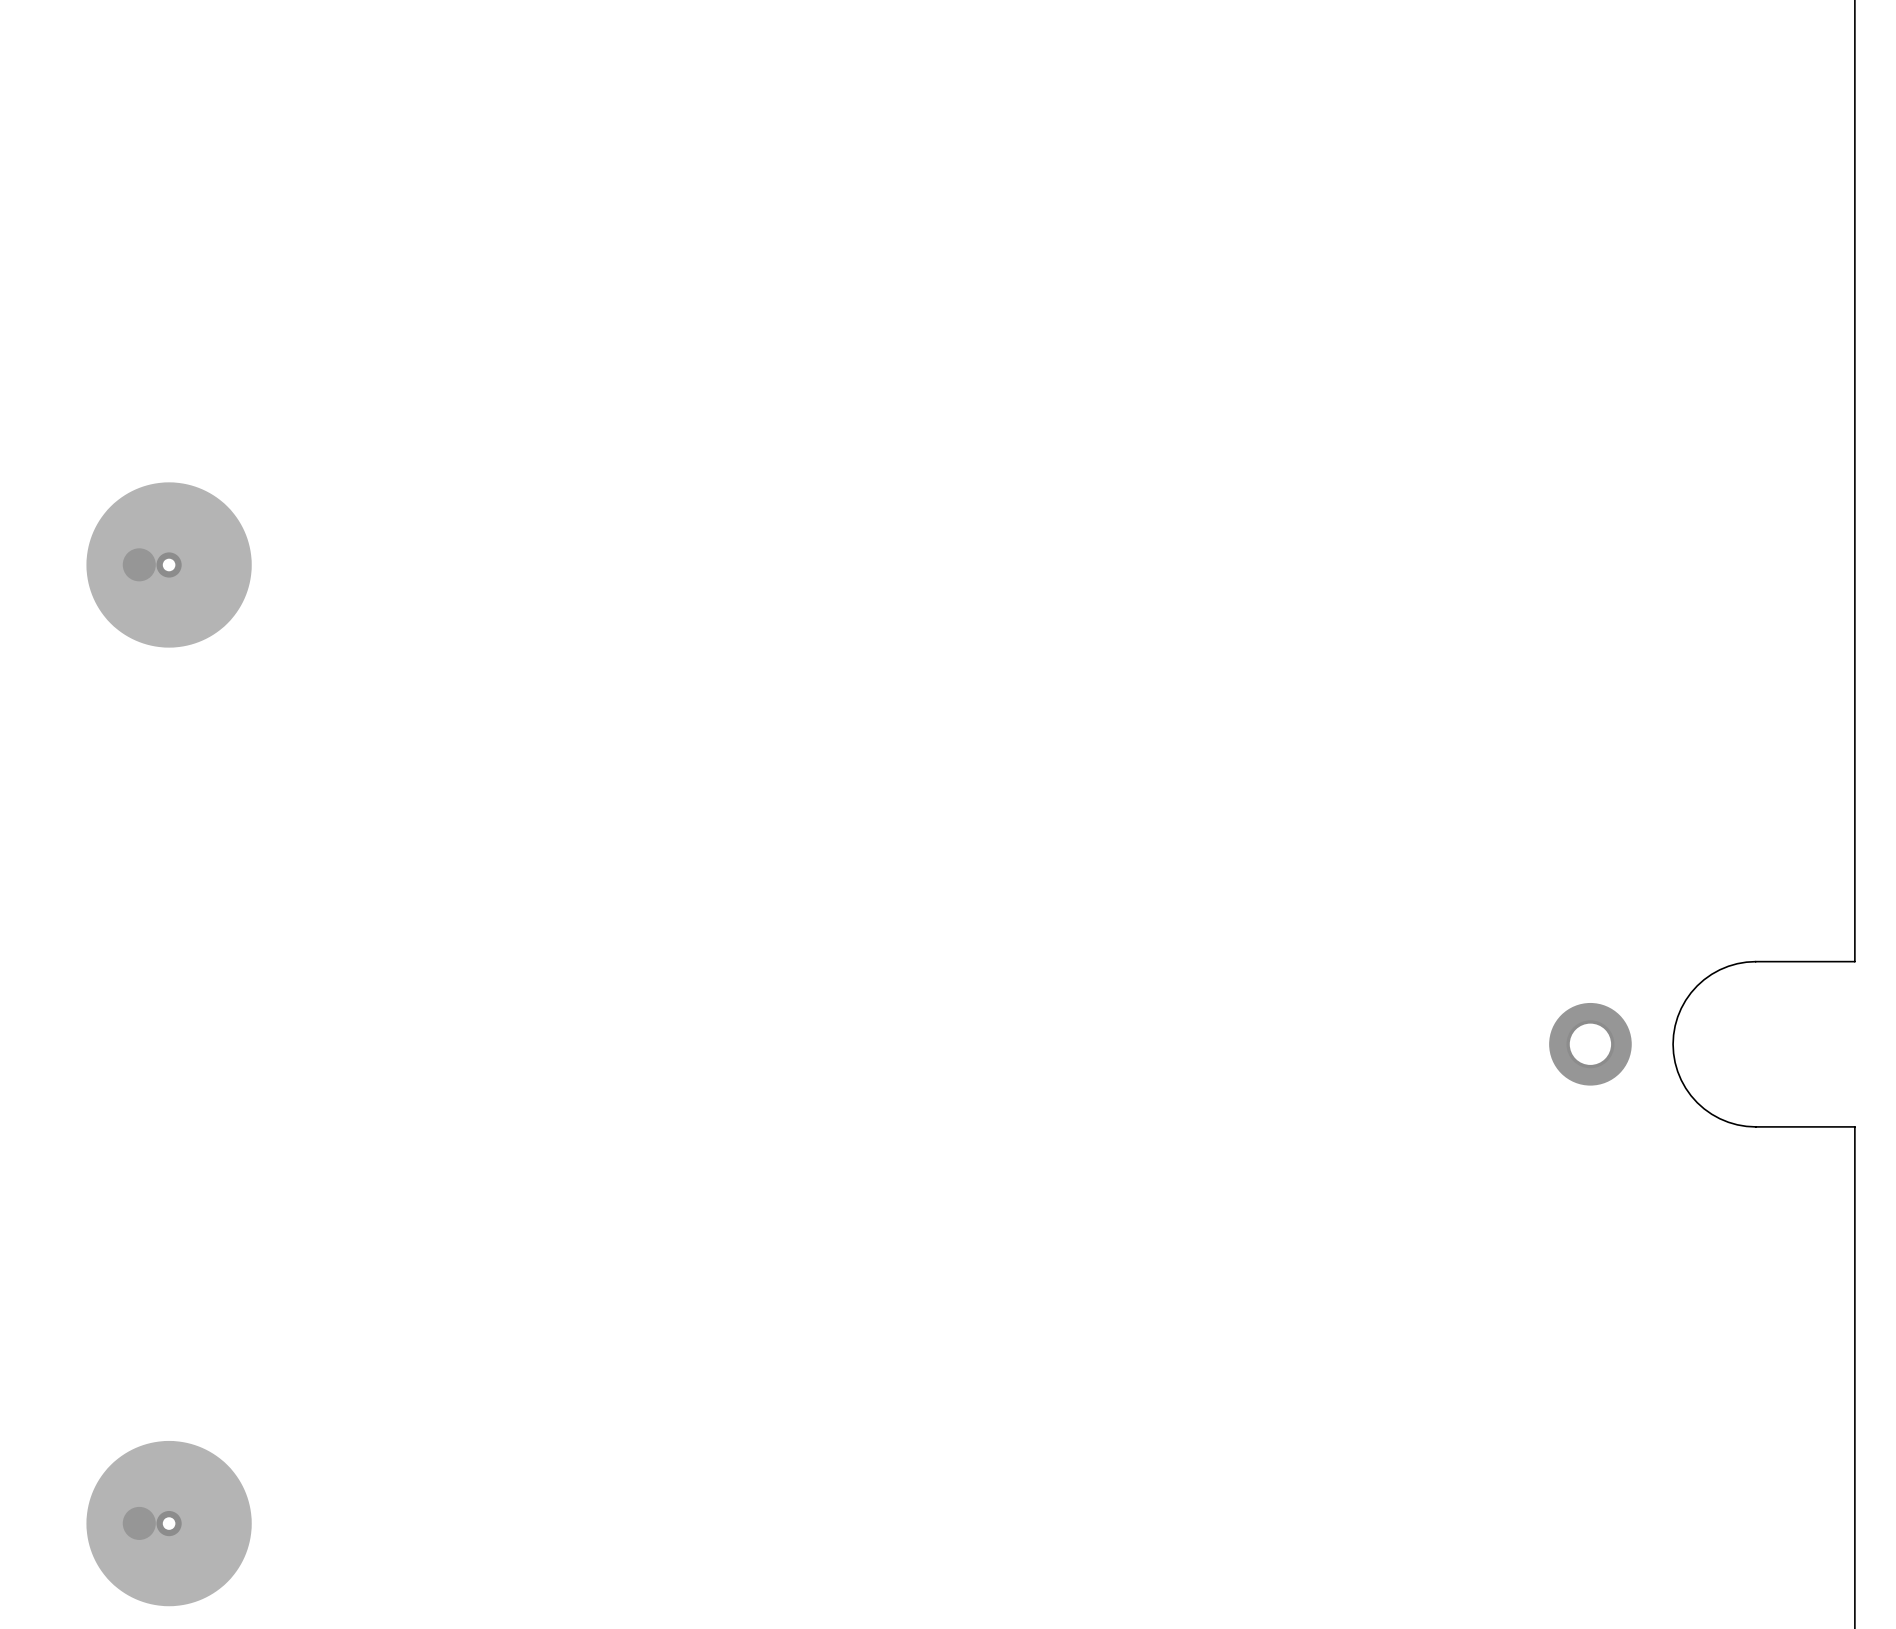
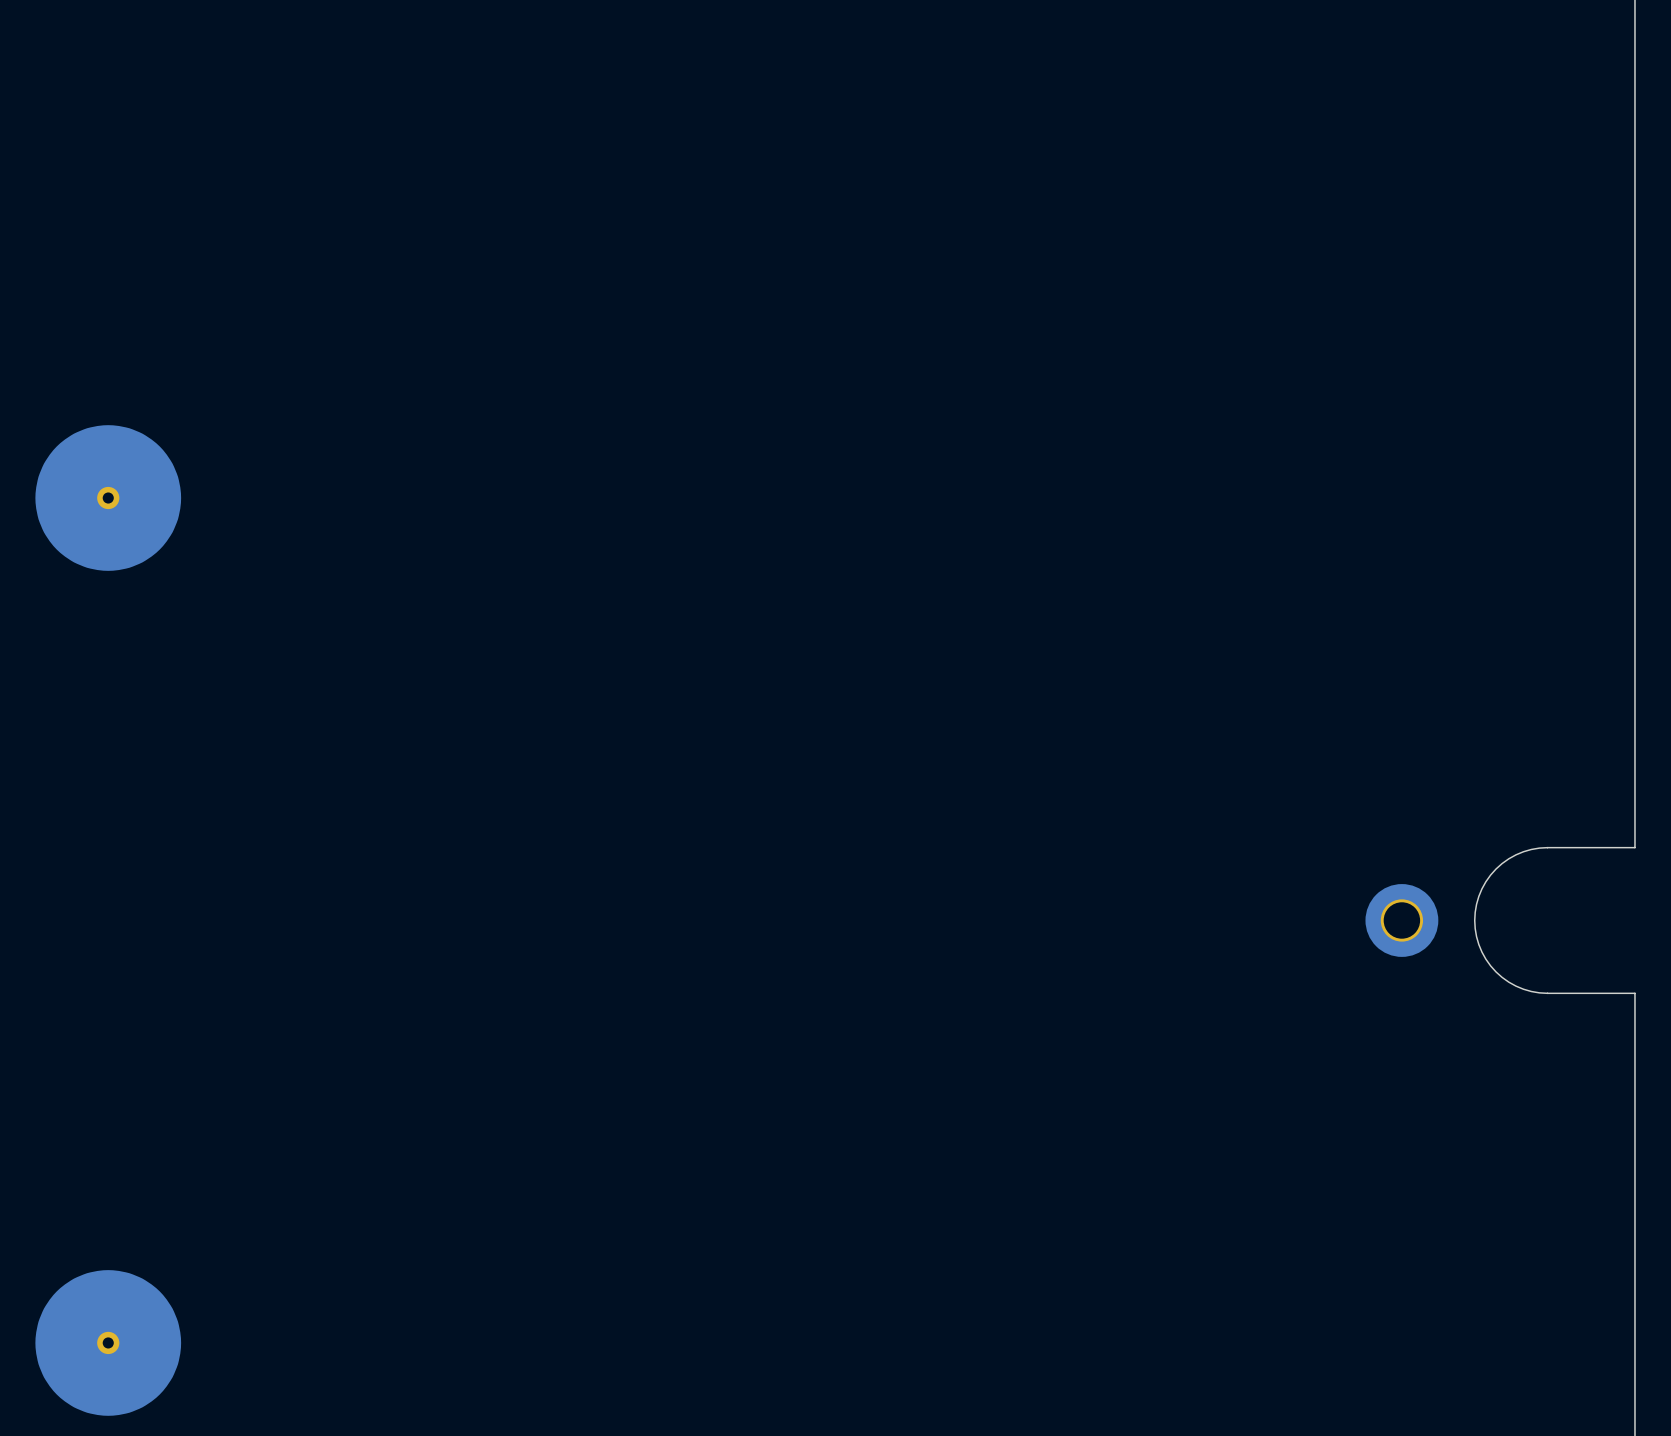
part position: (169, 564) -> (108, 498)
part position: (169, 1523) -> (108, 1342)

